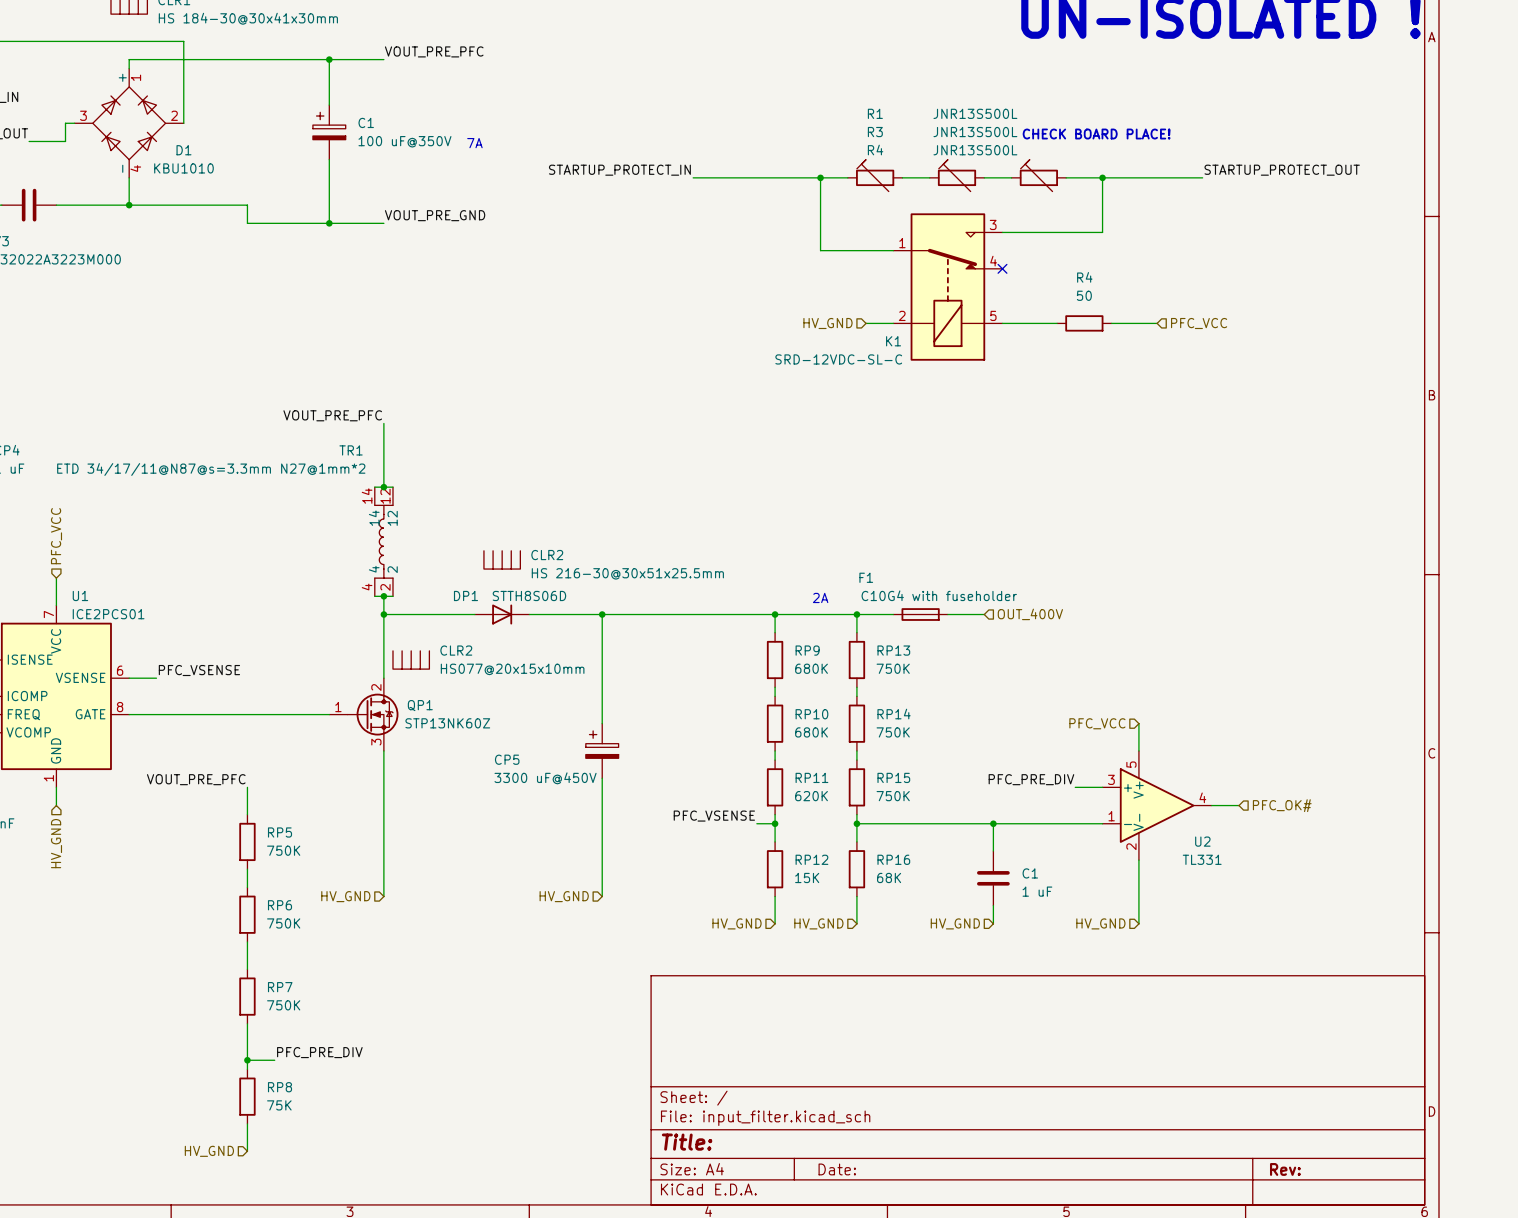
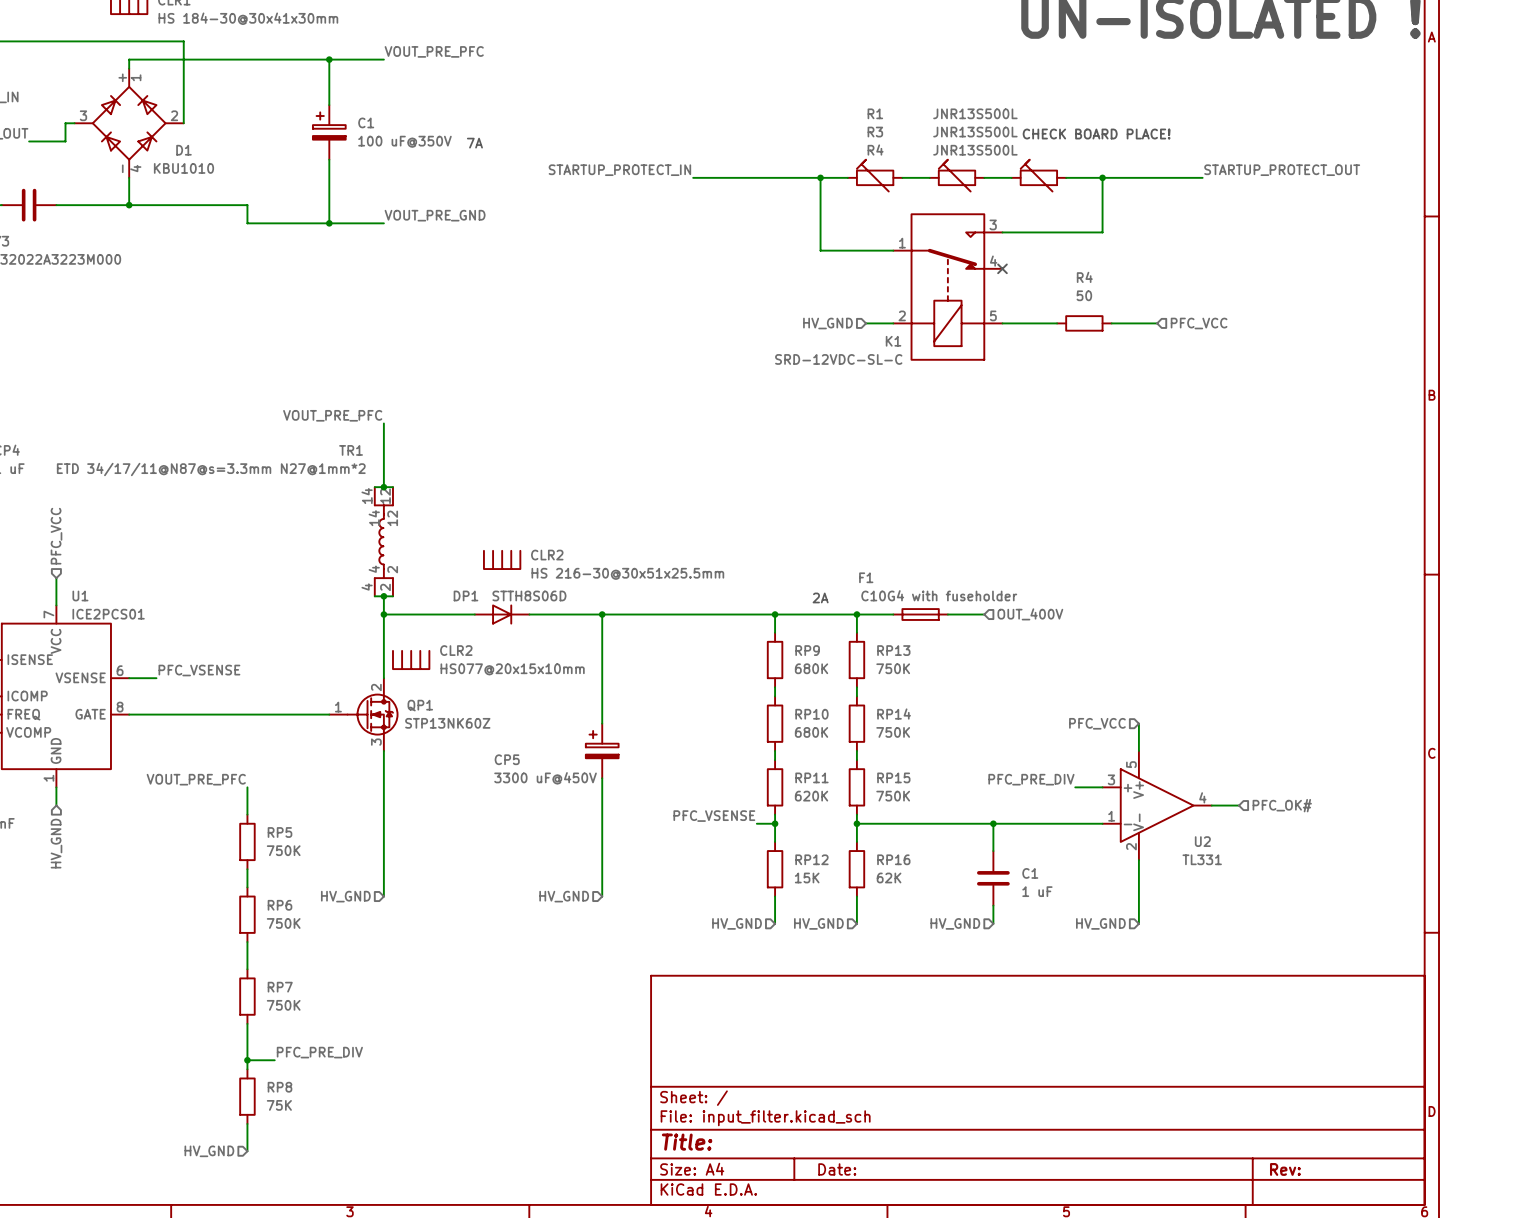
RP16 value: 68K (889, 877) -> 62K (889, 877)

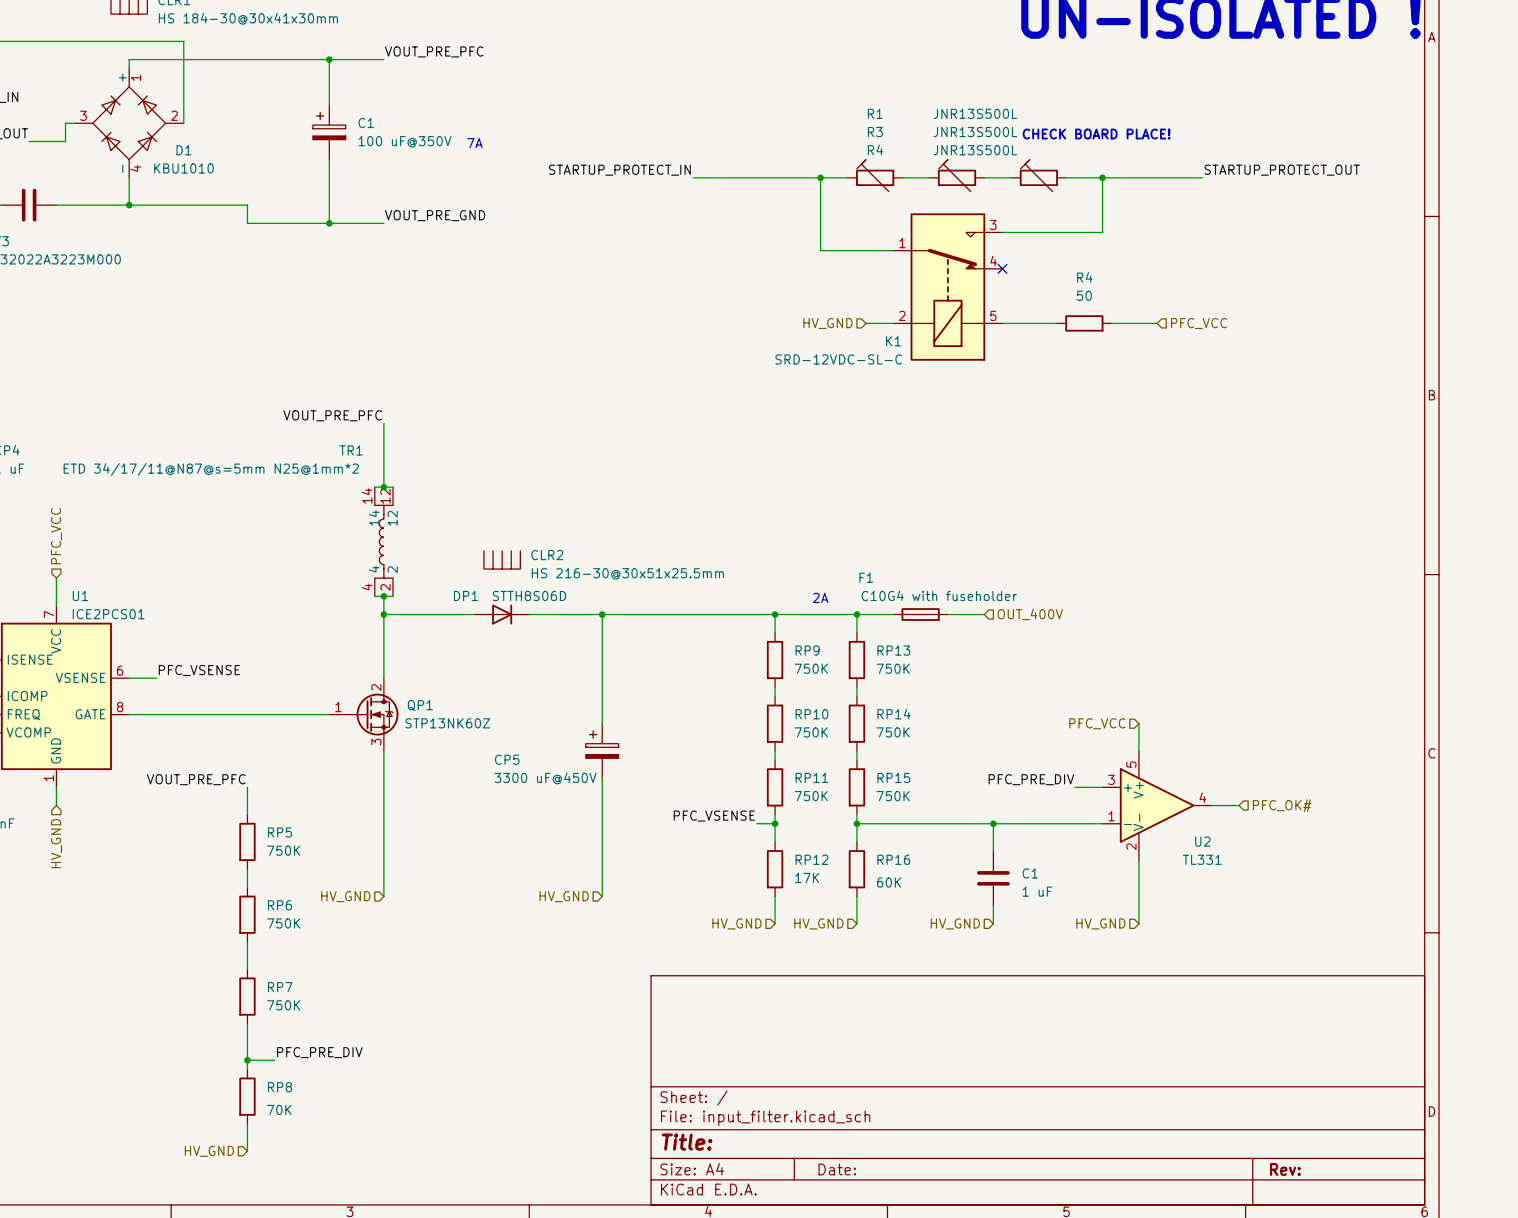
TR1 value: ETD 34/17/11@N87@s=3.3mm N27@1mm*2 (211, 469) -> ETD 34/17/11@N87@s=5mm N25@1mm*2 (211, 469)
CLR2: HS077@20x15x10mm (411, 660) -> none
RP9 value: 680K (811, 668) -> 750K (811, 668)
RP10 value: 680K (811, 732) -> 750K (811, 732)
RP11 value: 620K (811, 796) -> 750K (811, 796)
RP12 value: 15K (807, 877) -> 17K (807, 877)
RP16 value: 62K (889, 877) -> 60K (889, 882)
RP8 value: 75K (279, 1105) -> 70K (279, 1109)

